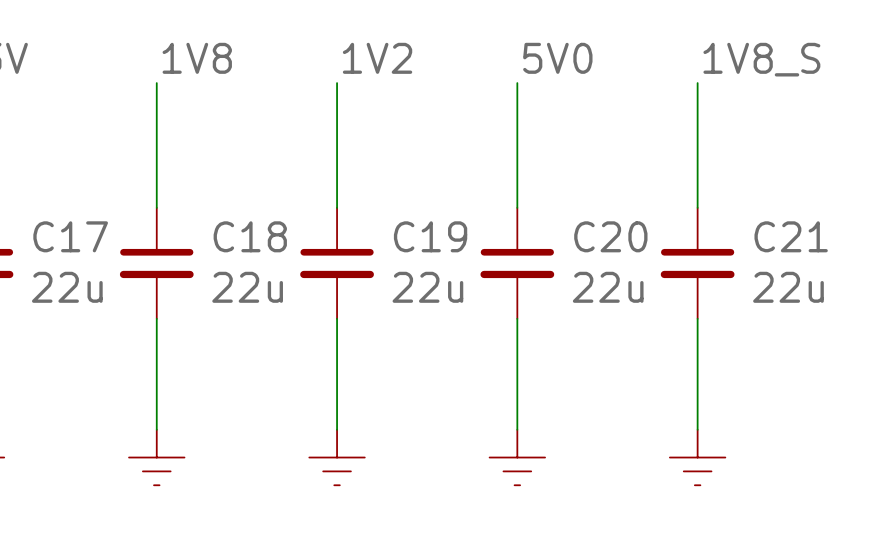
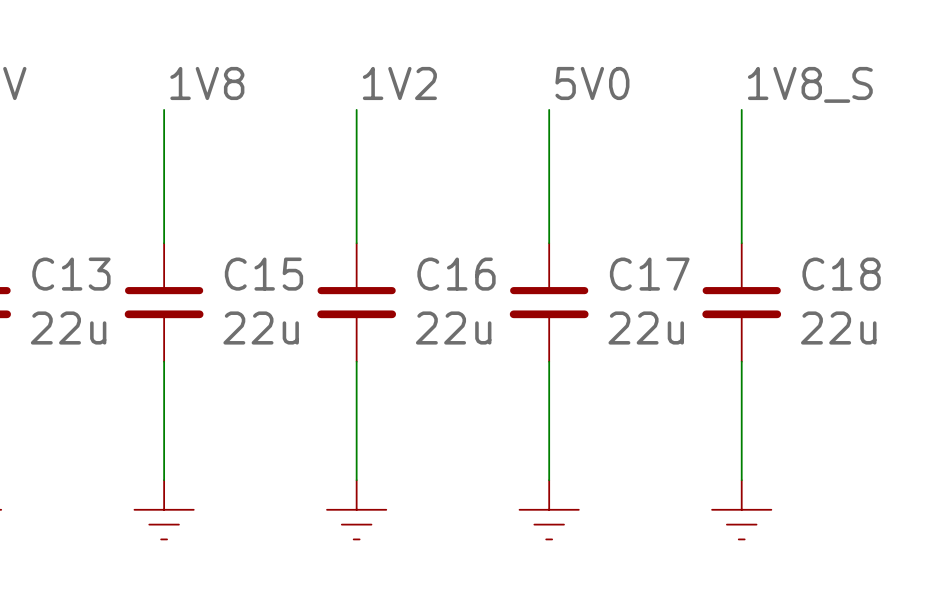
C17 name: C17 (70, 236) -> C13 (71, 274)
C18 name: C18 (250, 236) -> C15 (263, 274)
C19 name: C19 (430, 236) -> C16 (456, 274)
C20 name: C20 (610, 236) -> C17 (649, 274)
C21 name: C21 (791, 236) -> C18 (841, 274)

